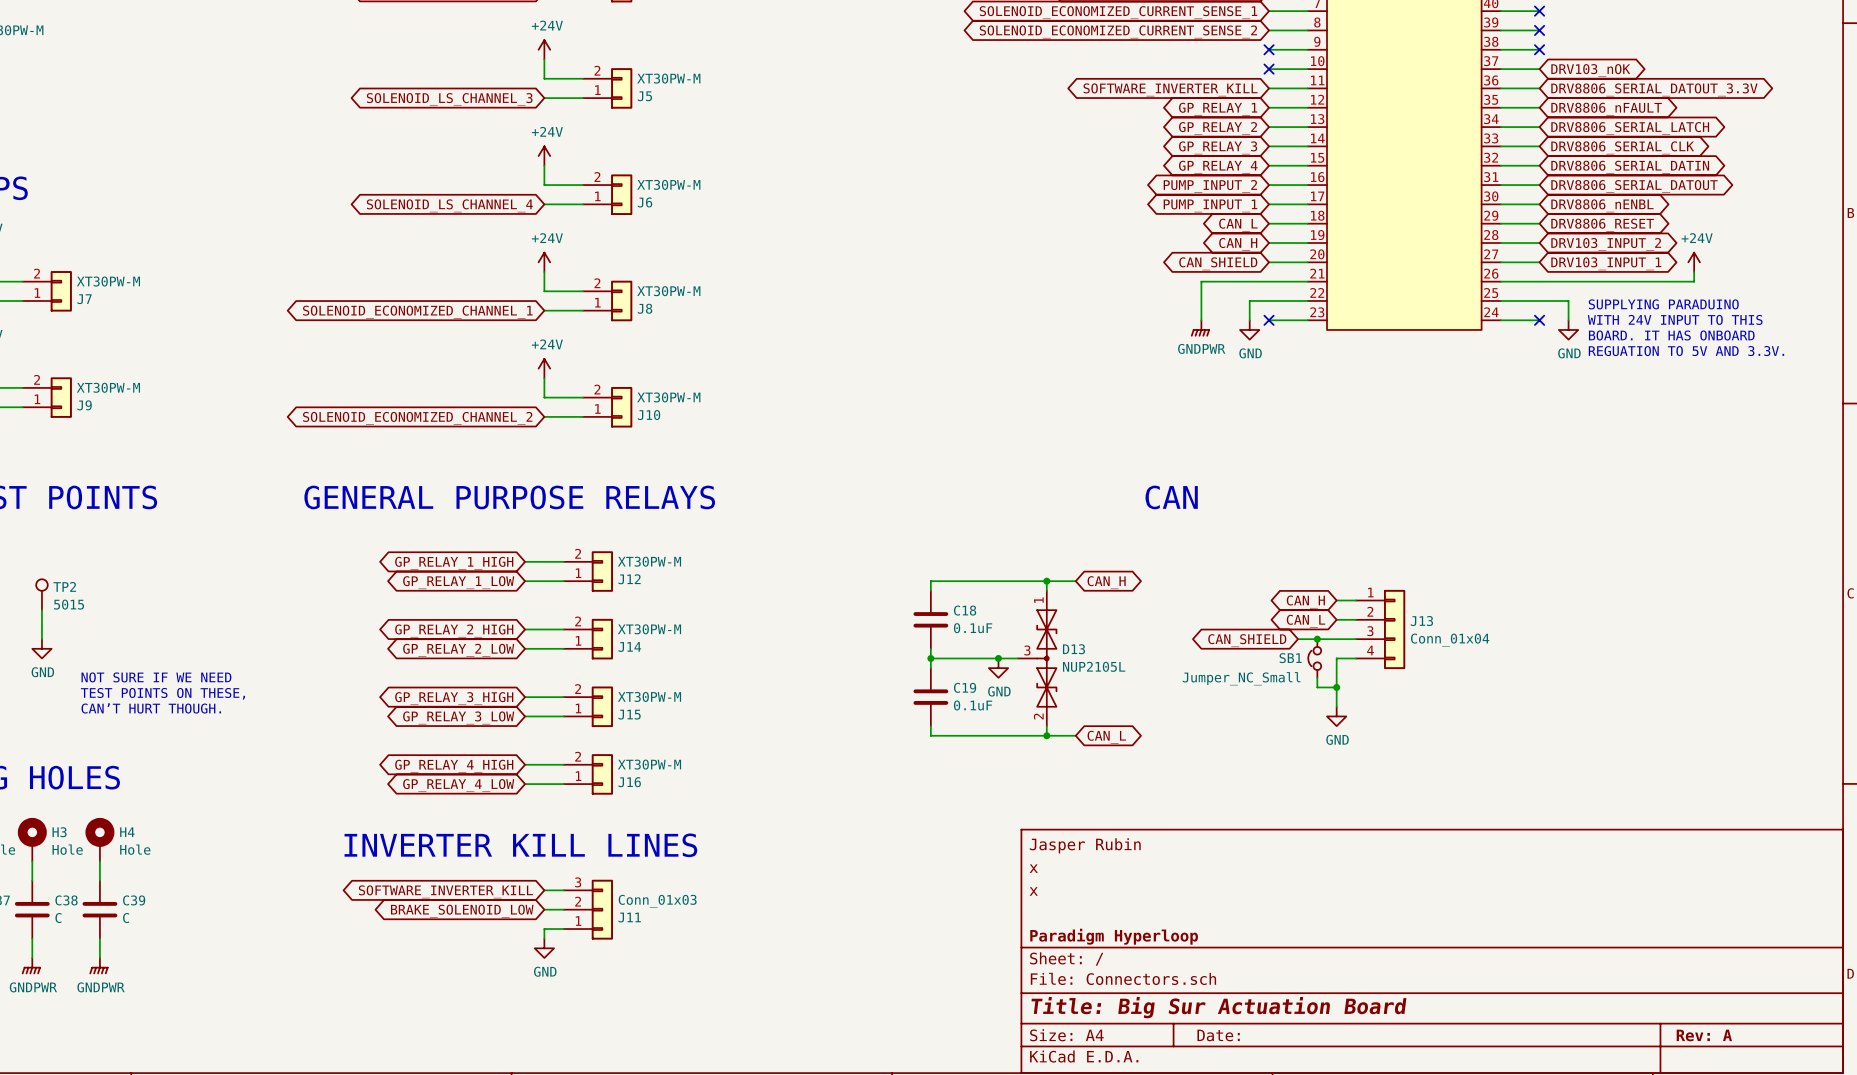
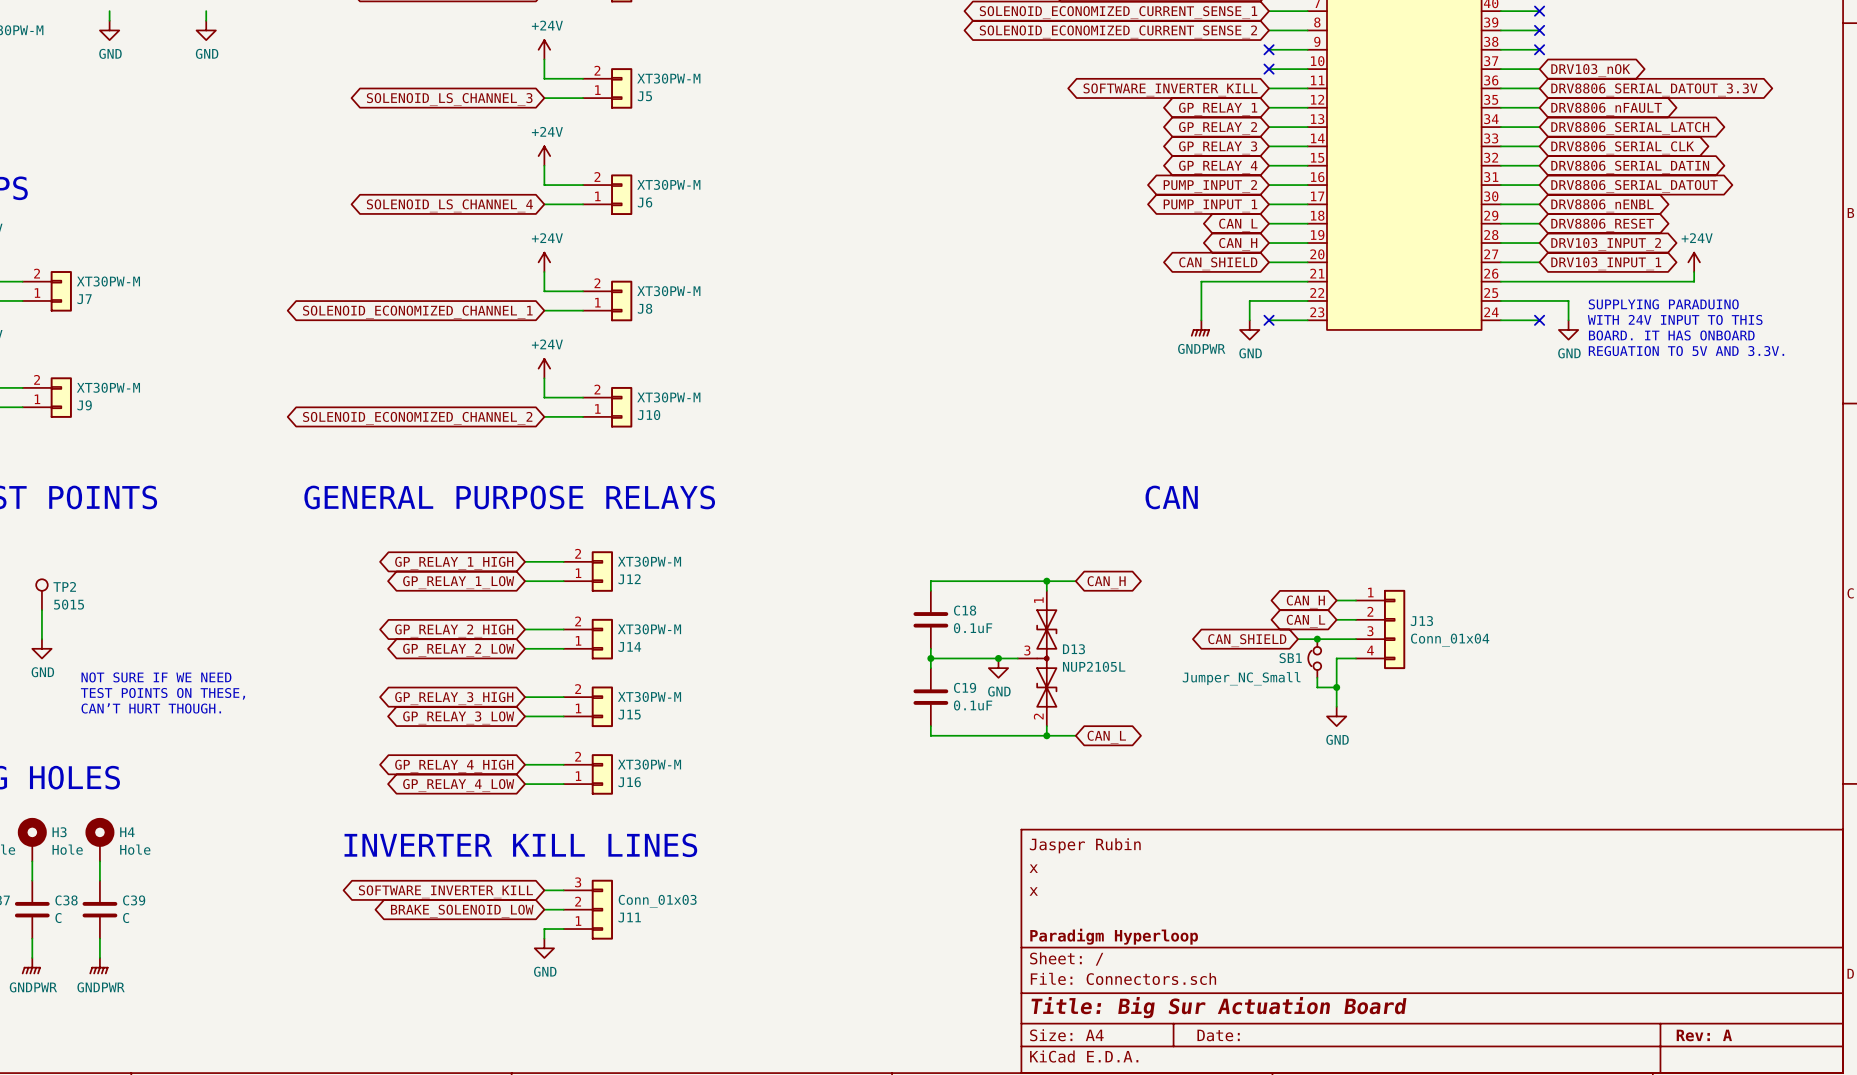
wire: none -> (109, 11) (109, 20)
wire: none -> (206, 11) (206, 20)
power symbol: none -> GND (109, 30)
power symbol: none -> GND (206, 30)

